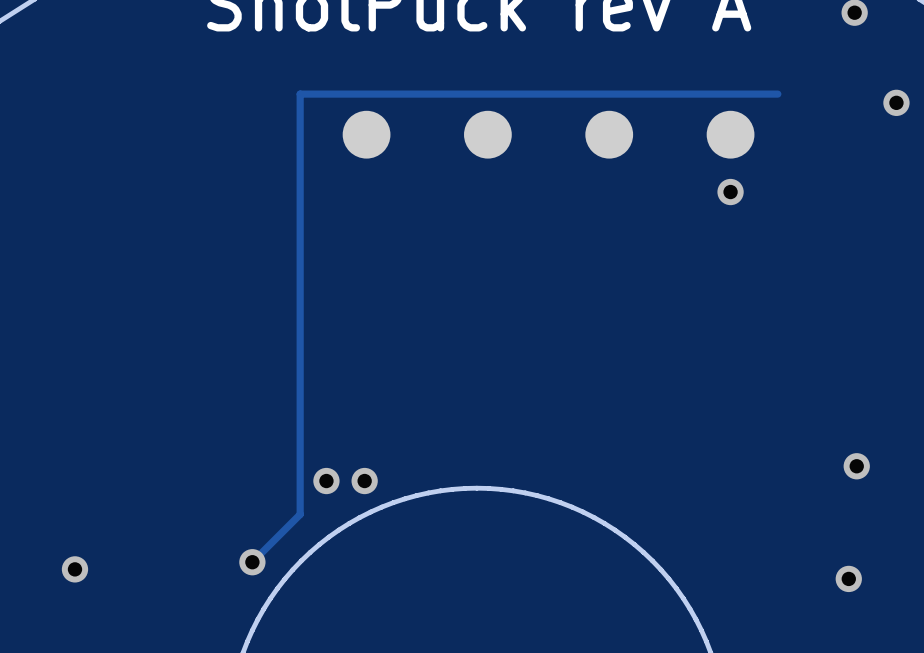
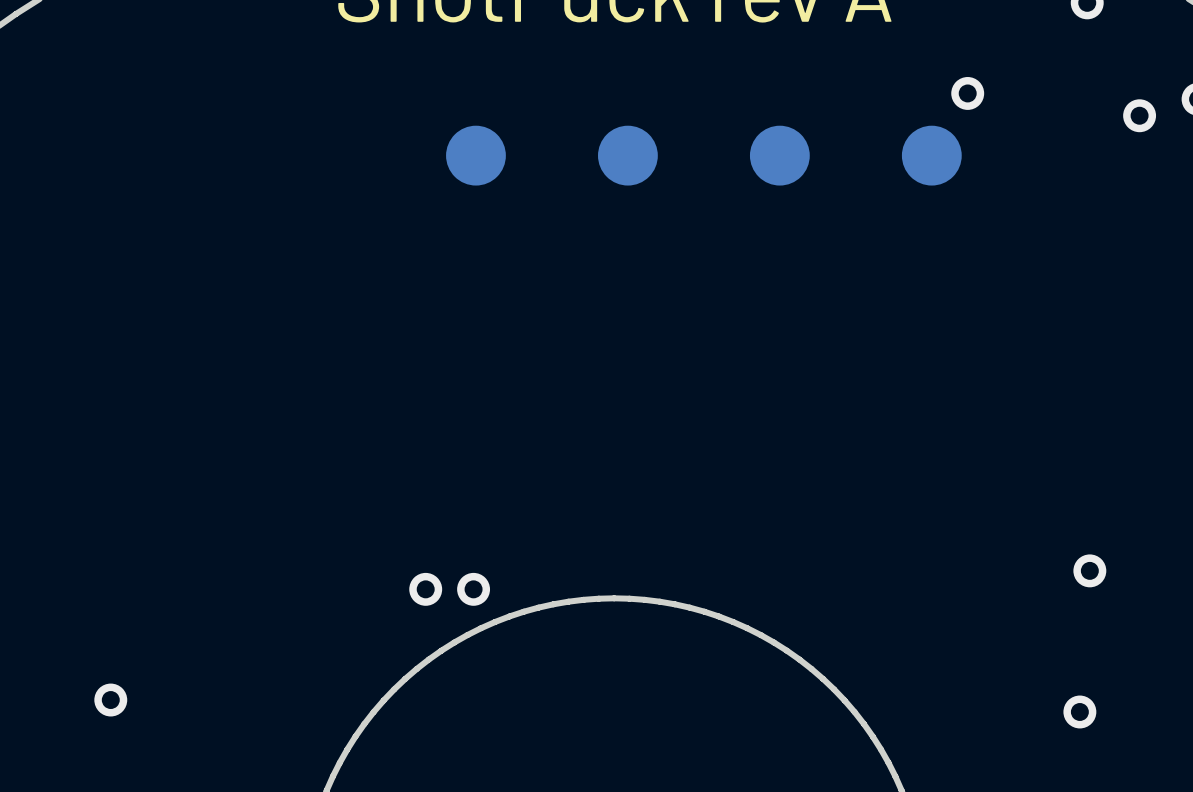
track: (777, 94) (300, 94) (300, 514) (252, 562) -> none
via position: (730, 192) -> (967, 93)
via: (252, 562) -> none

